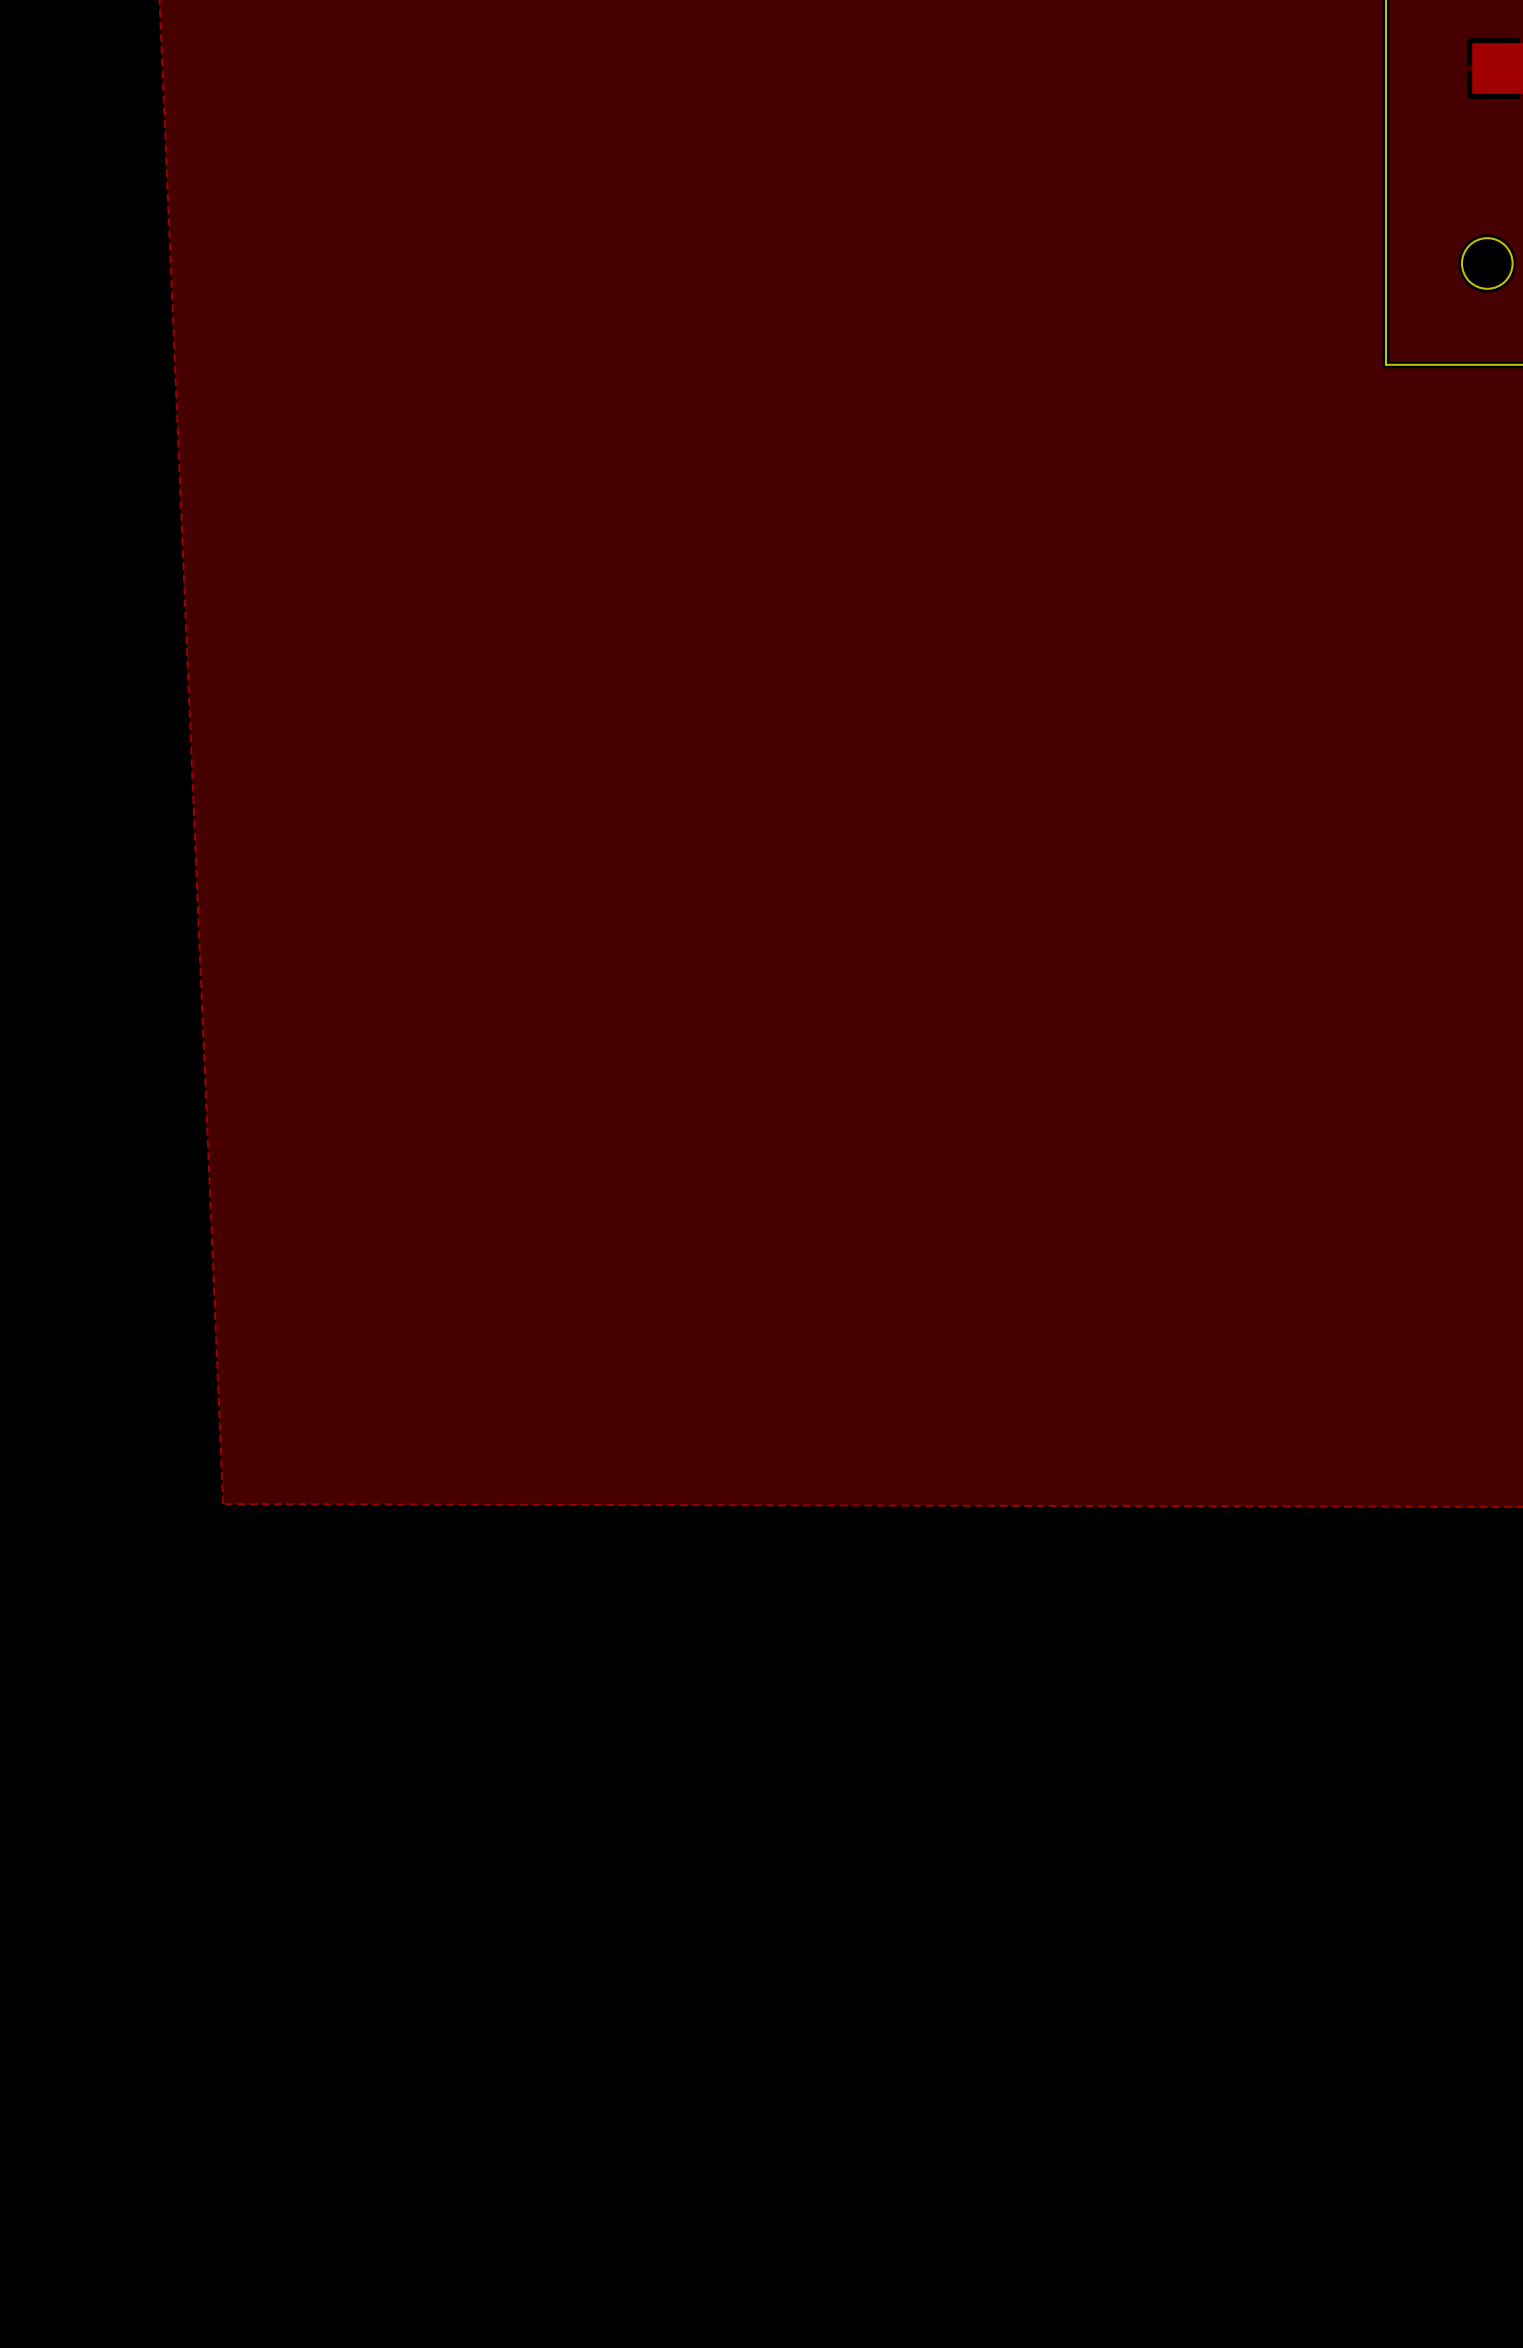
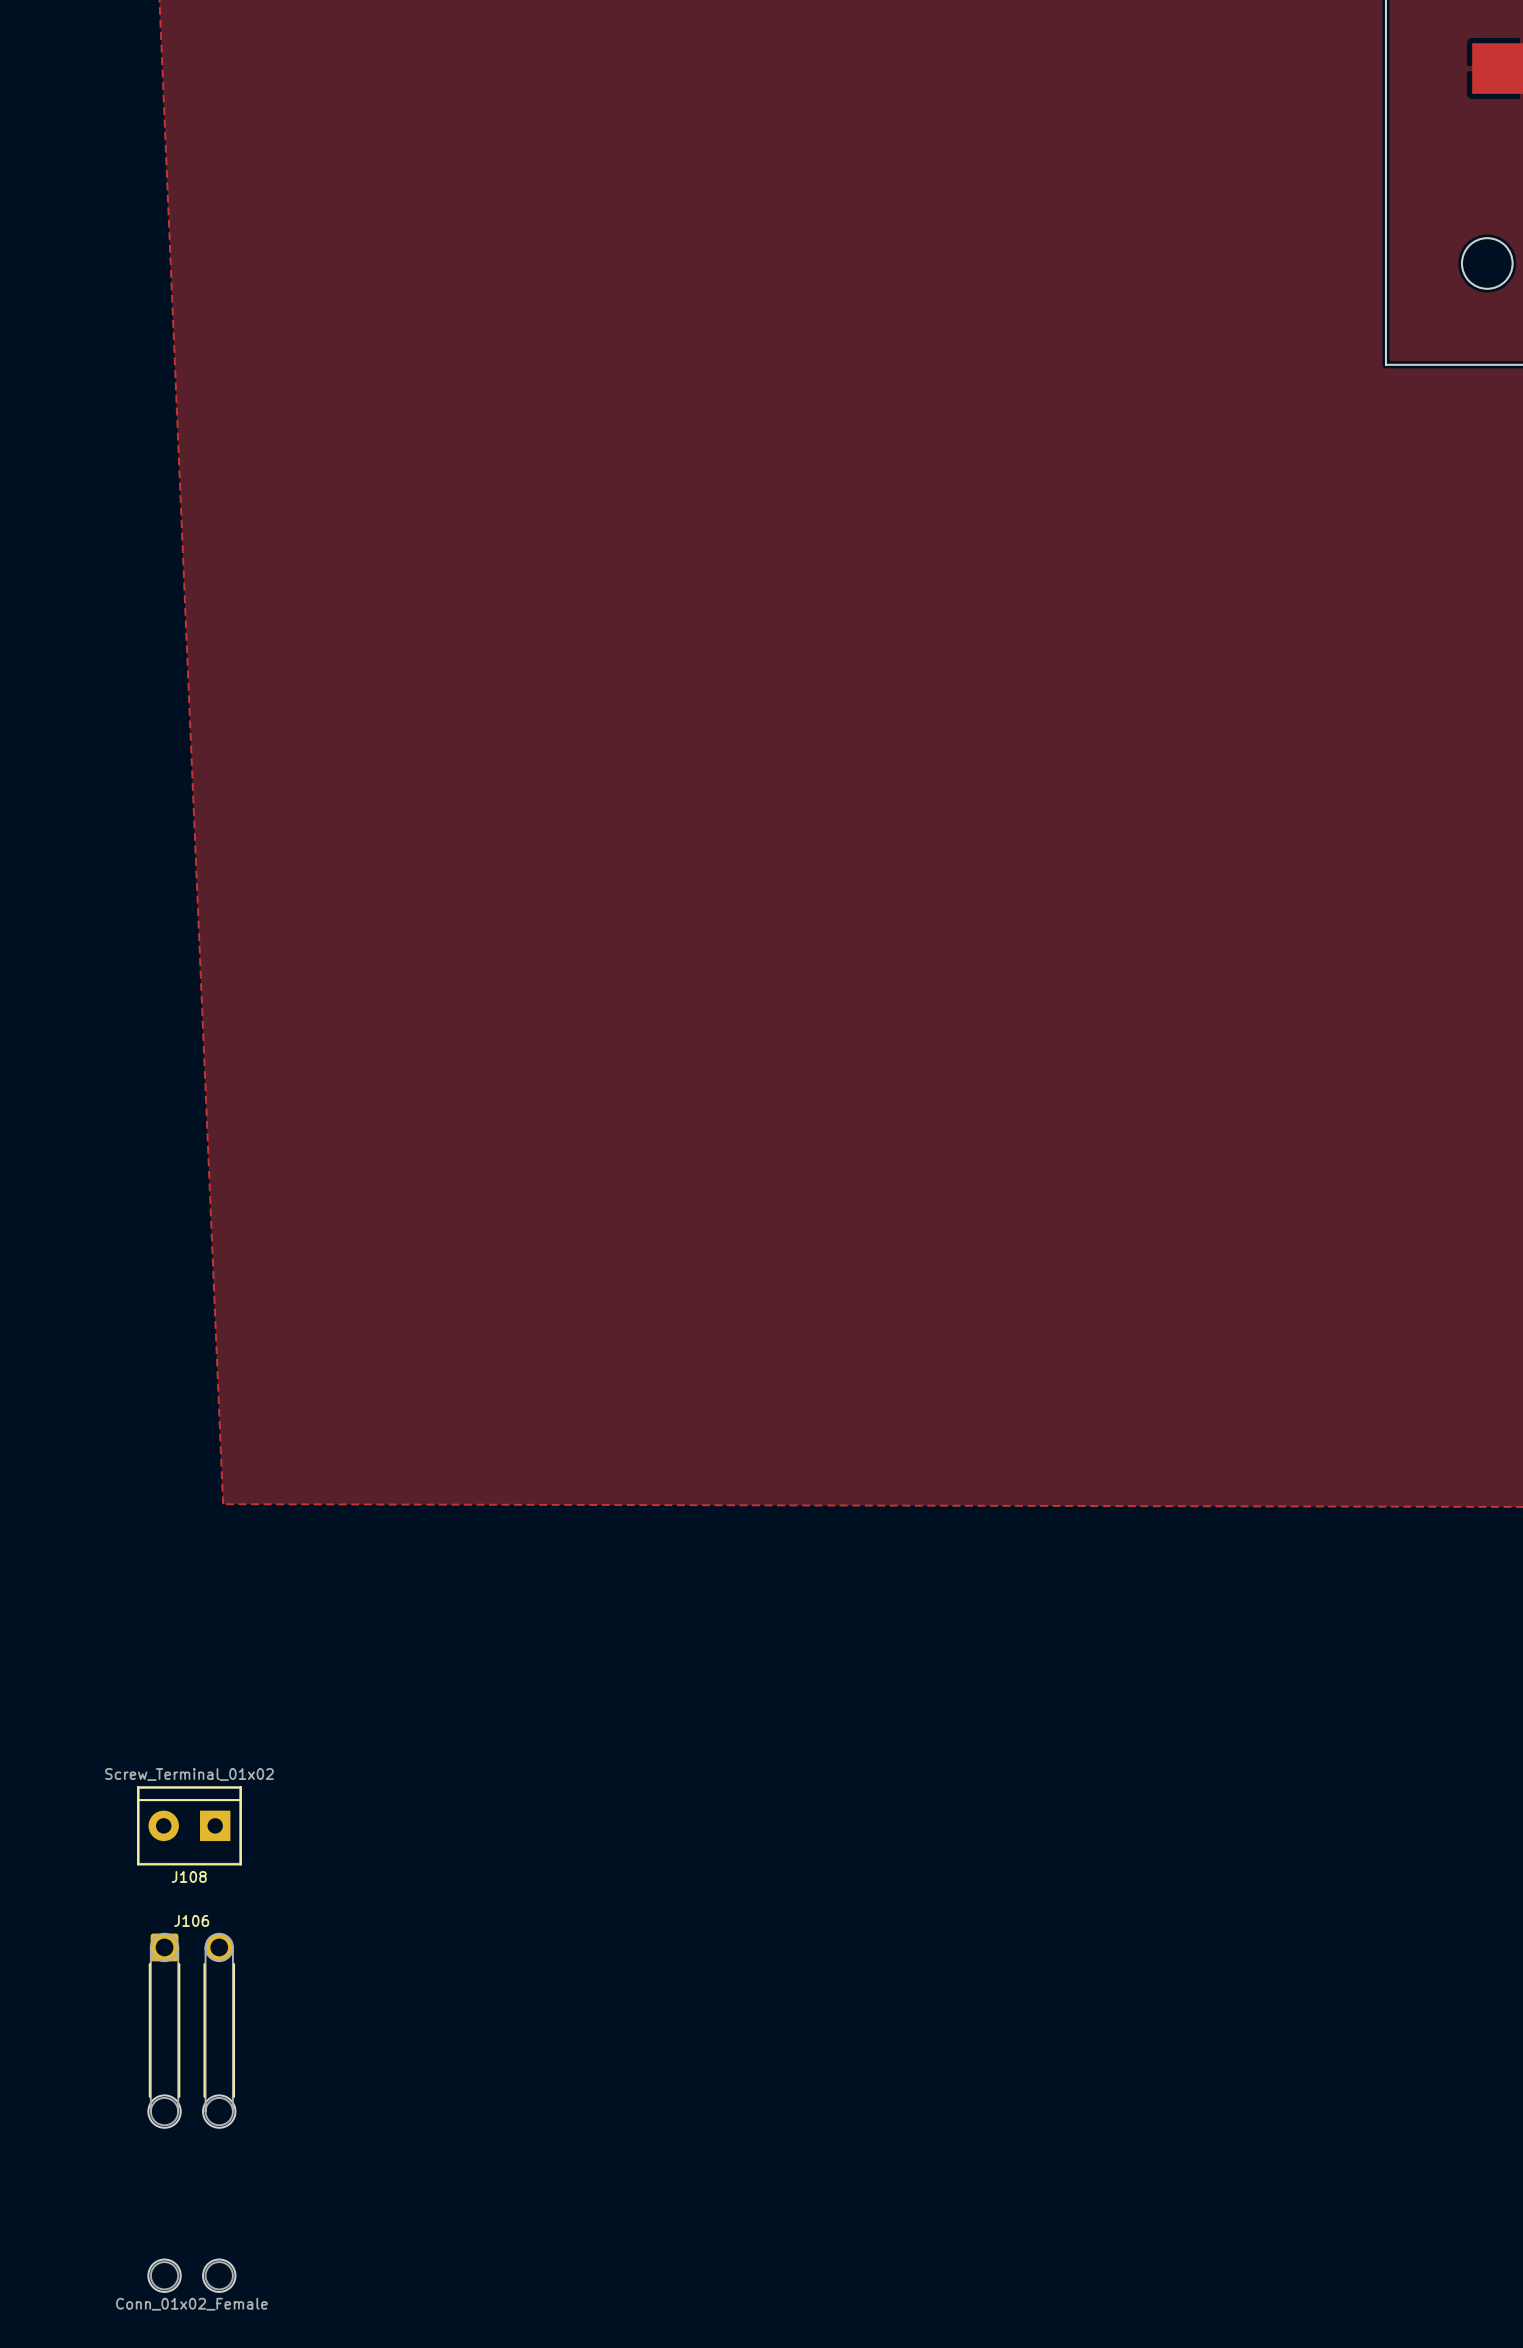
J108: none -> Screw_Terminal_01x02 (189, 1825)
J106: none -> Conn_01x02_Female (191, 2112)

